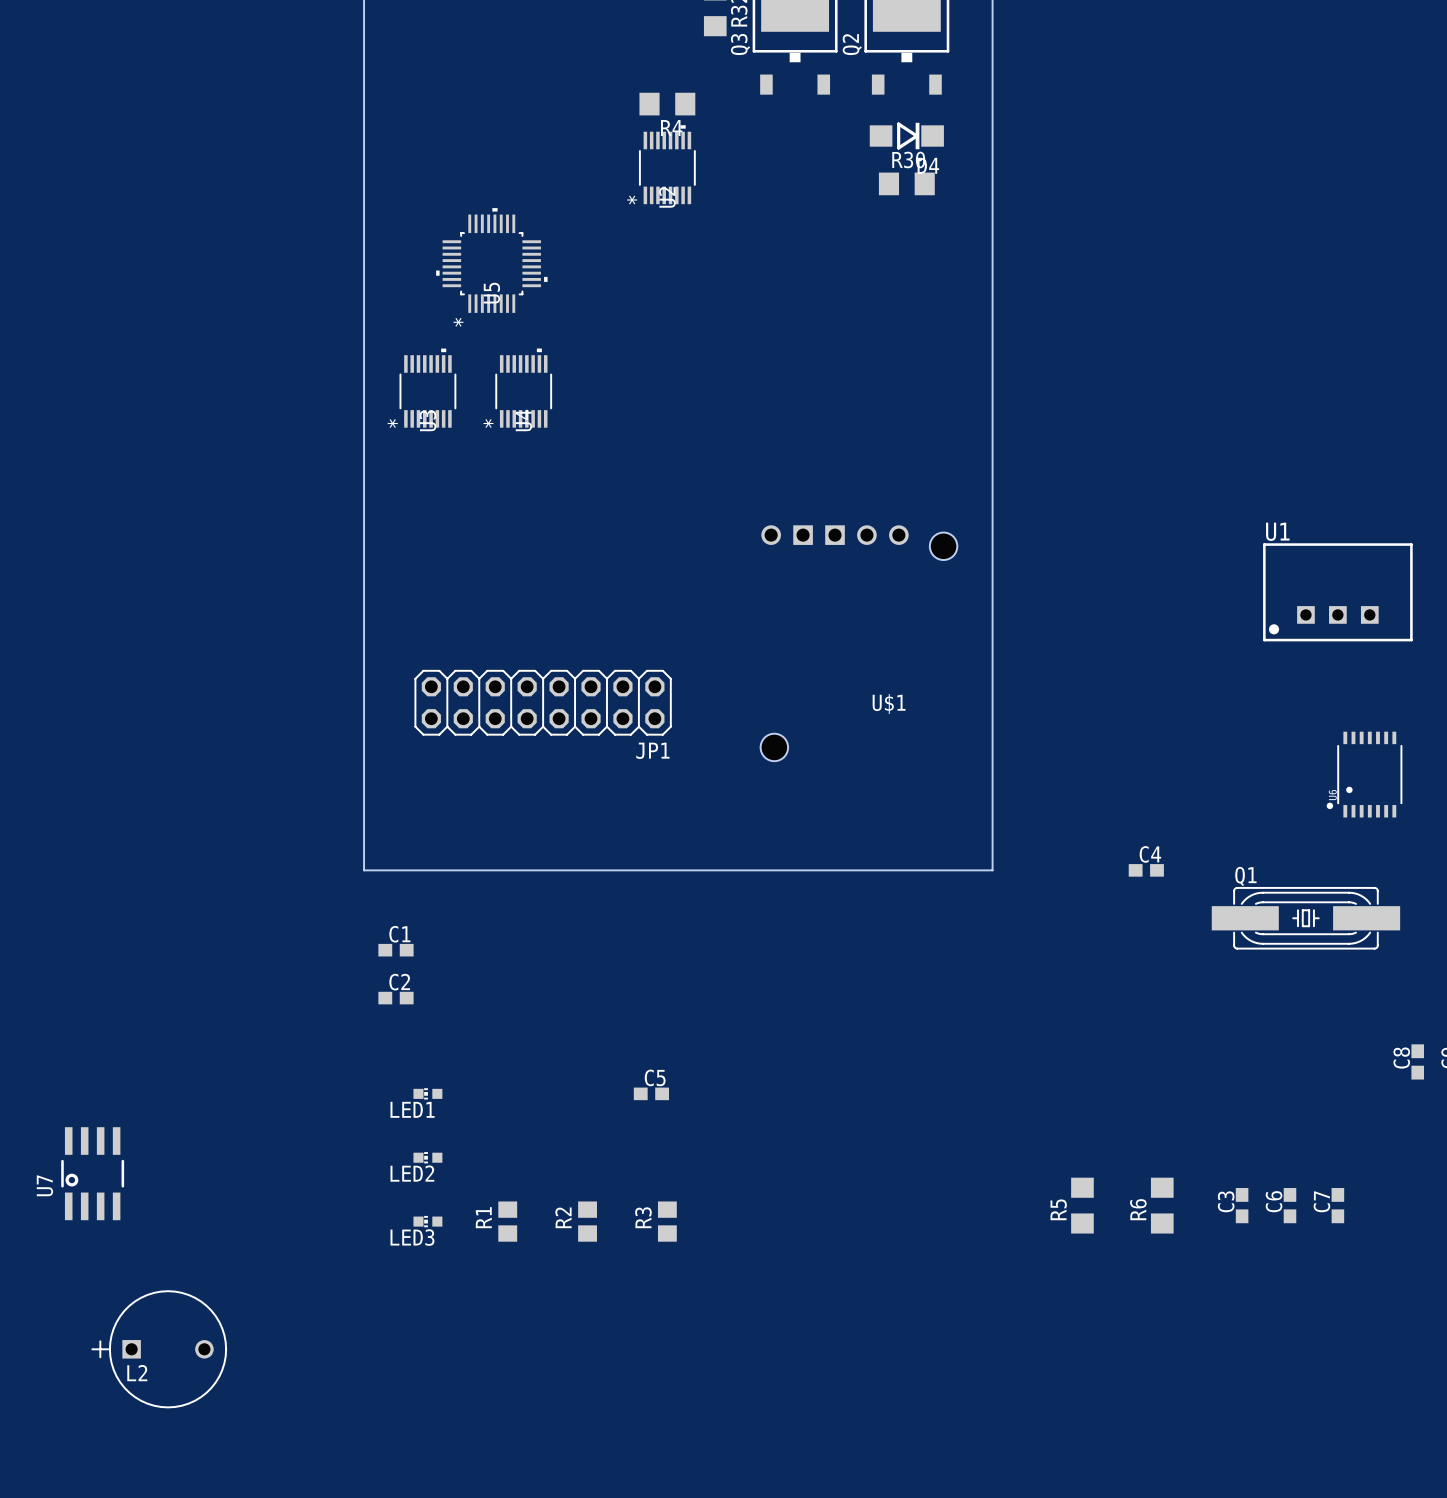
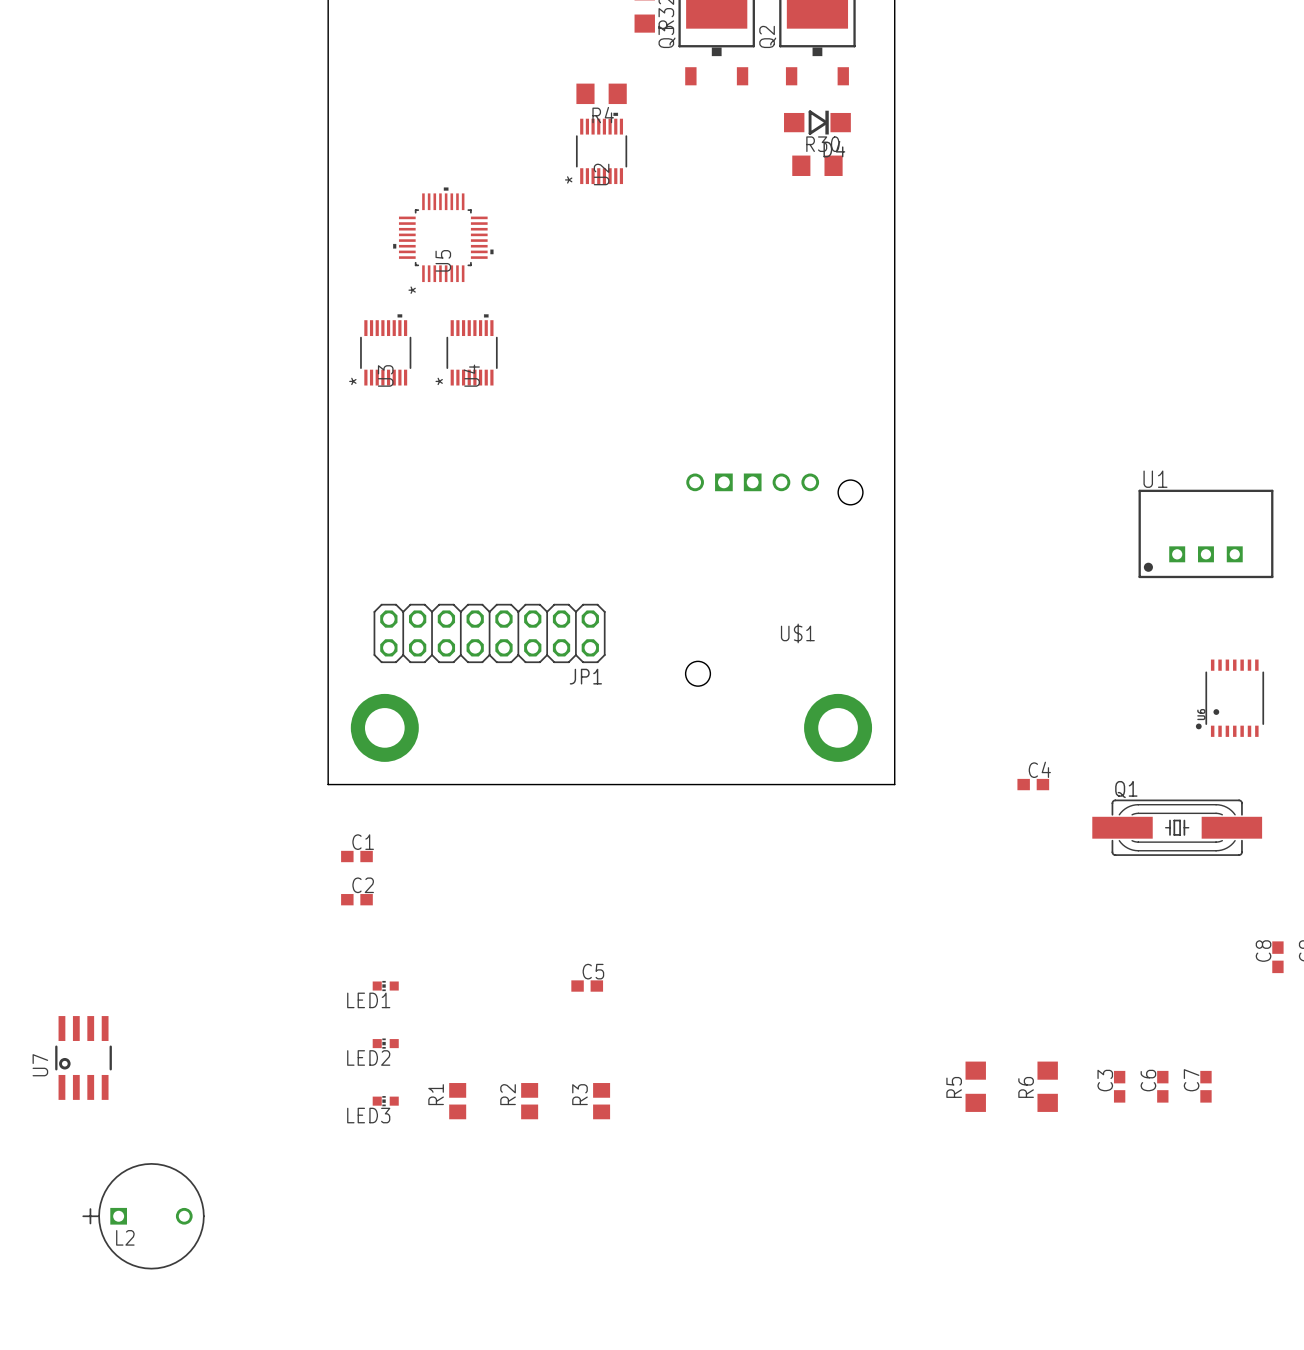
via: none -> (384, 727)
via: none -> (838, 727)

